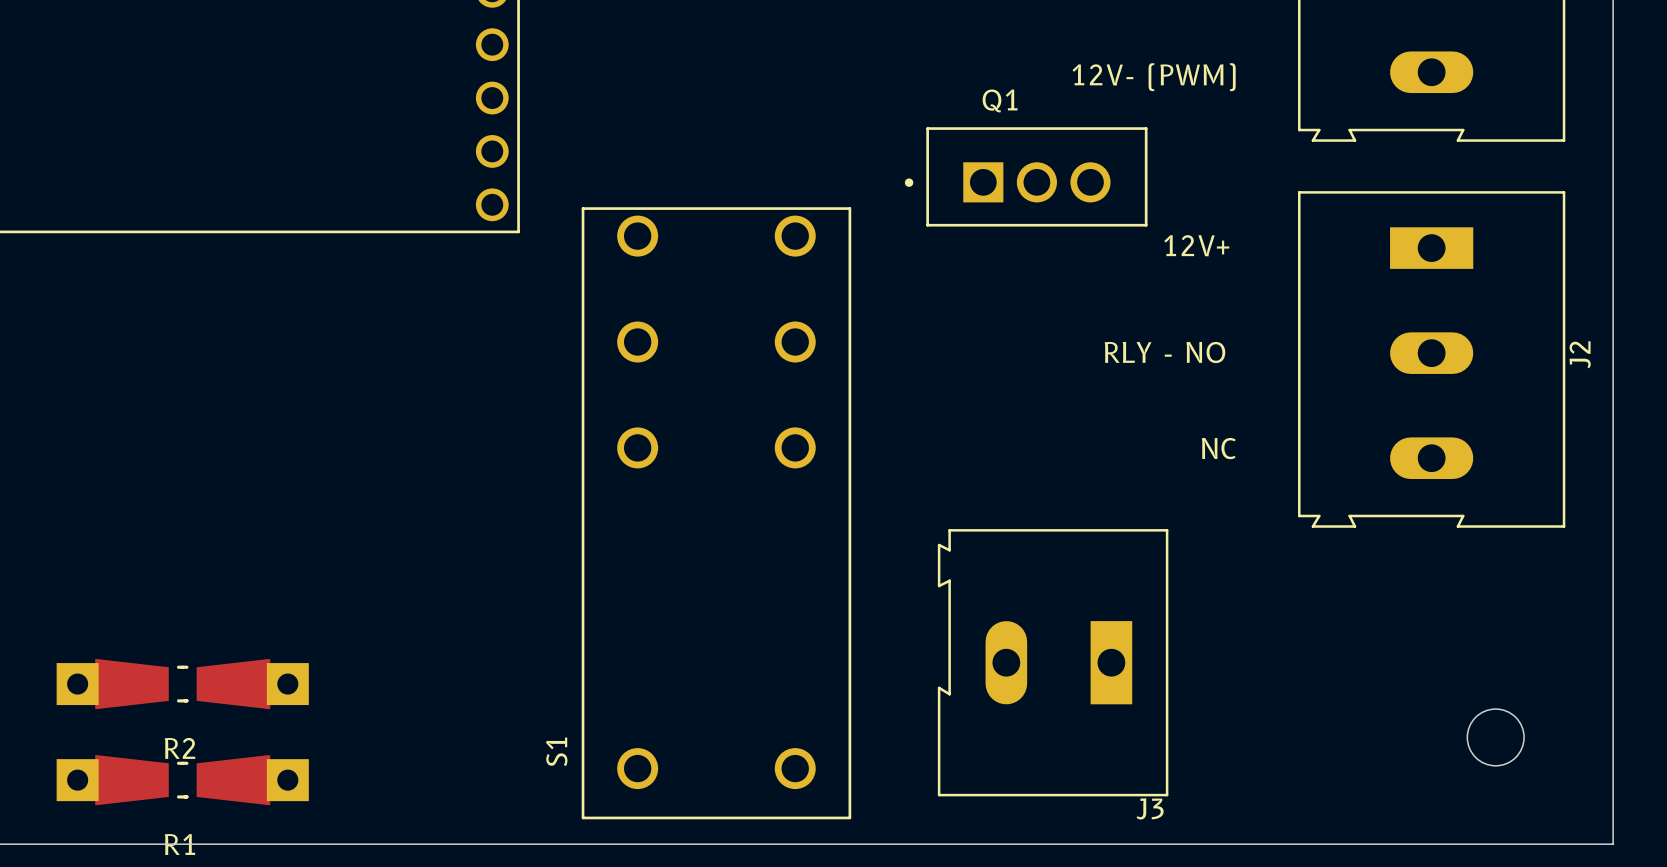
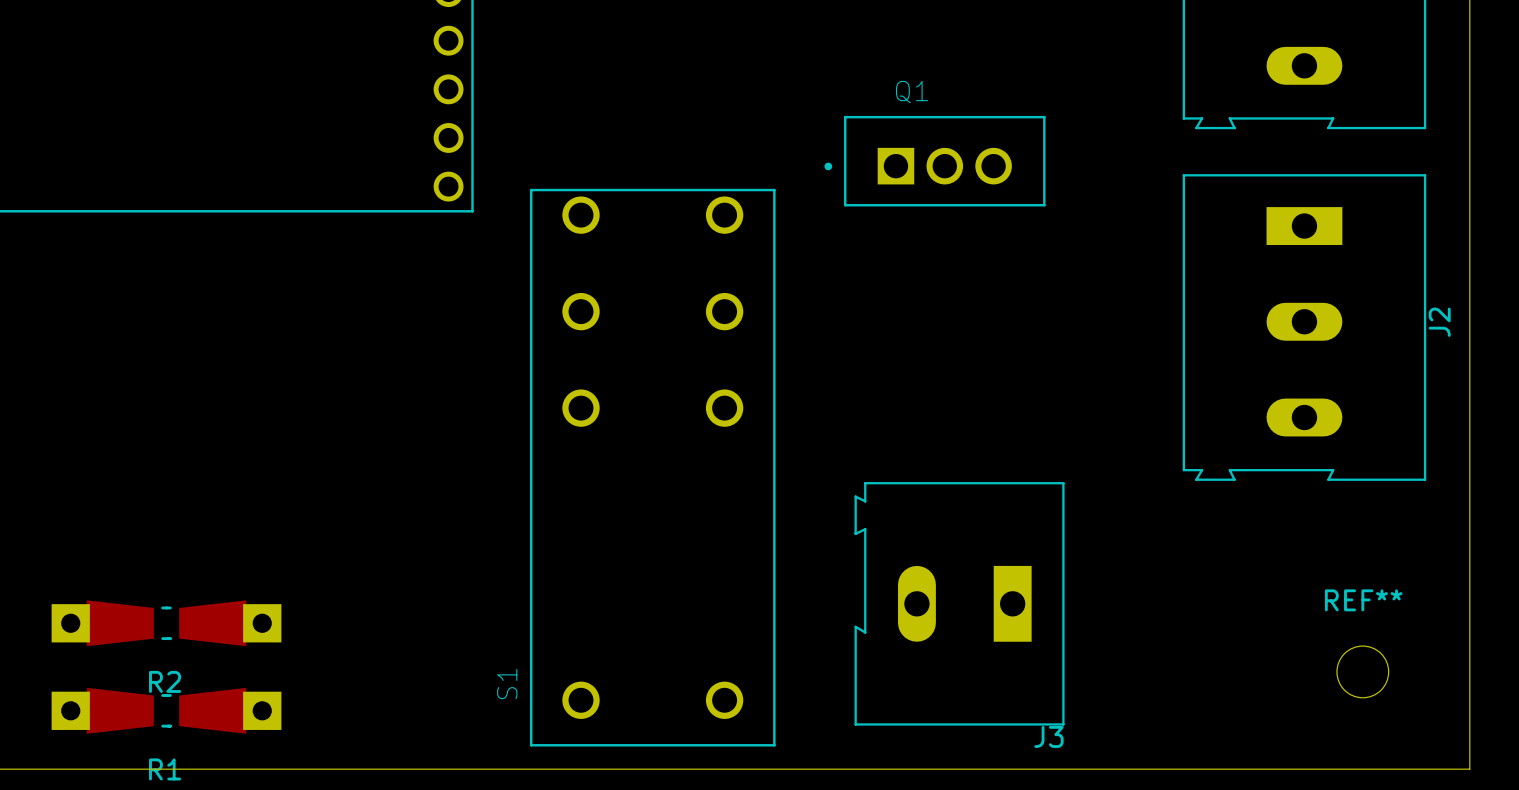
text: 12V- (PWM) (1154, 77) -> none
text: 12V+ (1196, 245) -> none
text: RLY - NO (1165, 352) -> none
text: NC (1218, 448) -> none
REF** name: none -> REF** (1363, 600)

